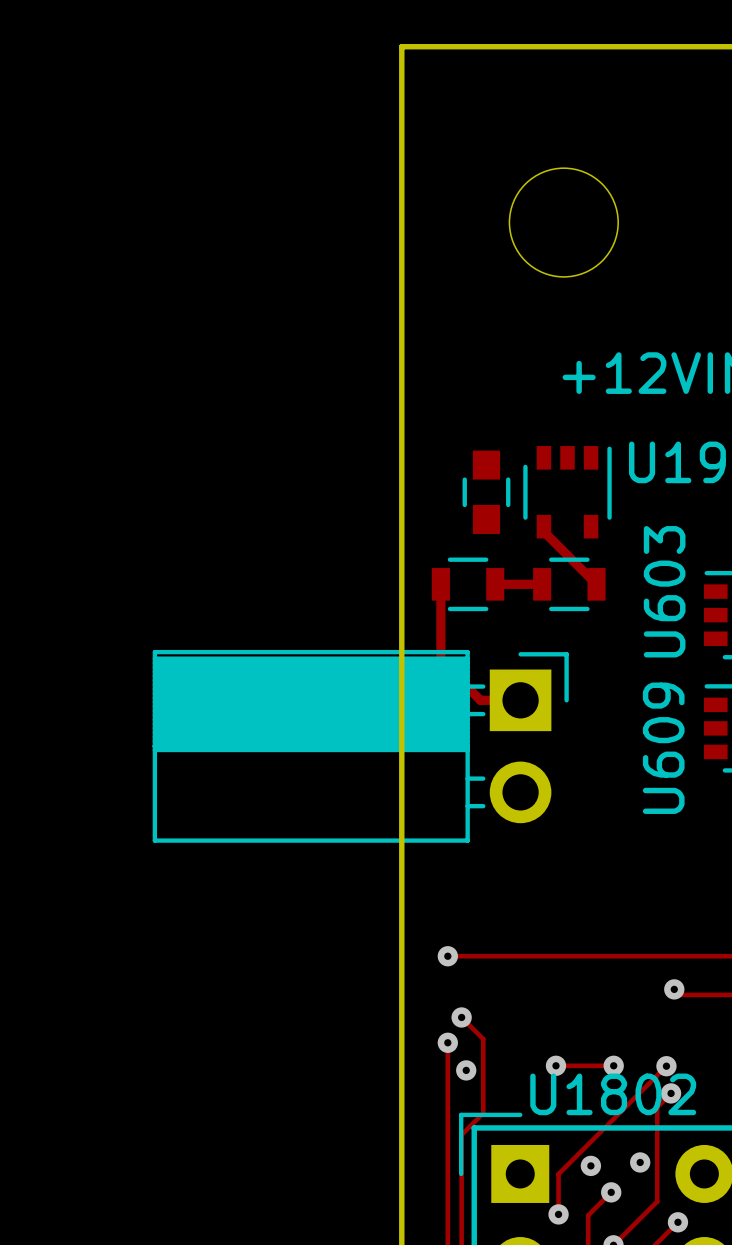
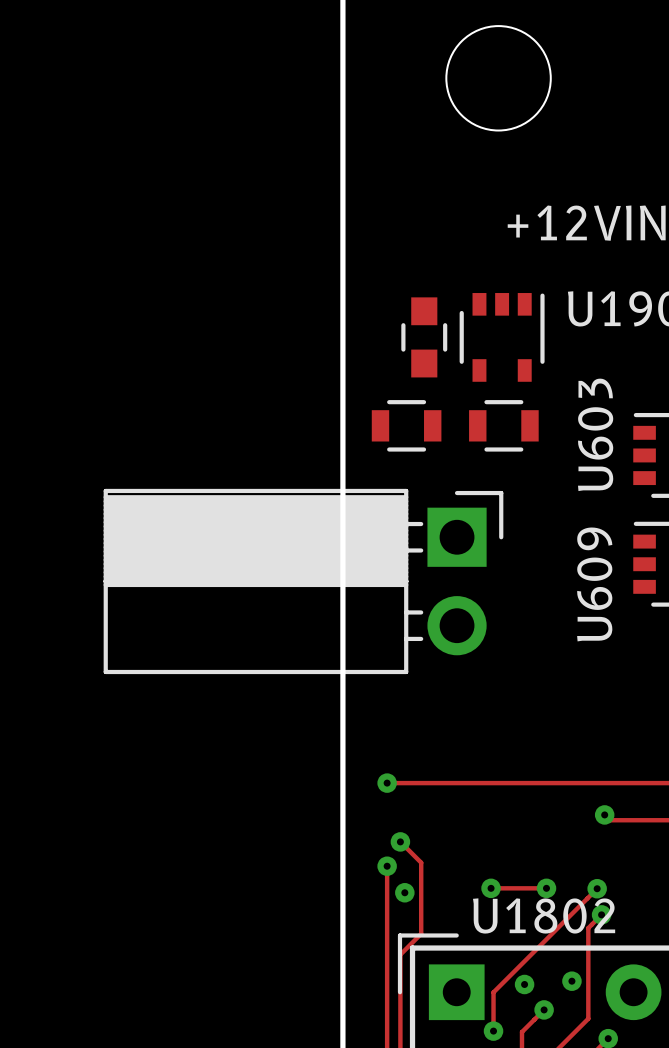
track: (543, 526) (543, 531) (596, 584) -> none
track: (440, 584) (440, 660) (480, 700) (520, 700) -> none
track: (495, 584) (542, 584) -> none

